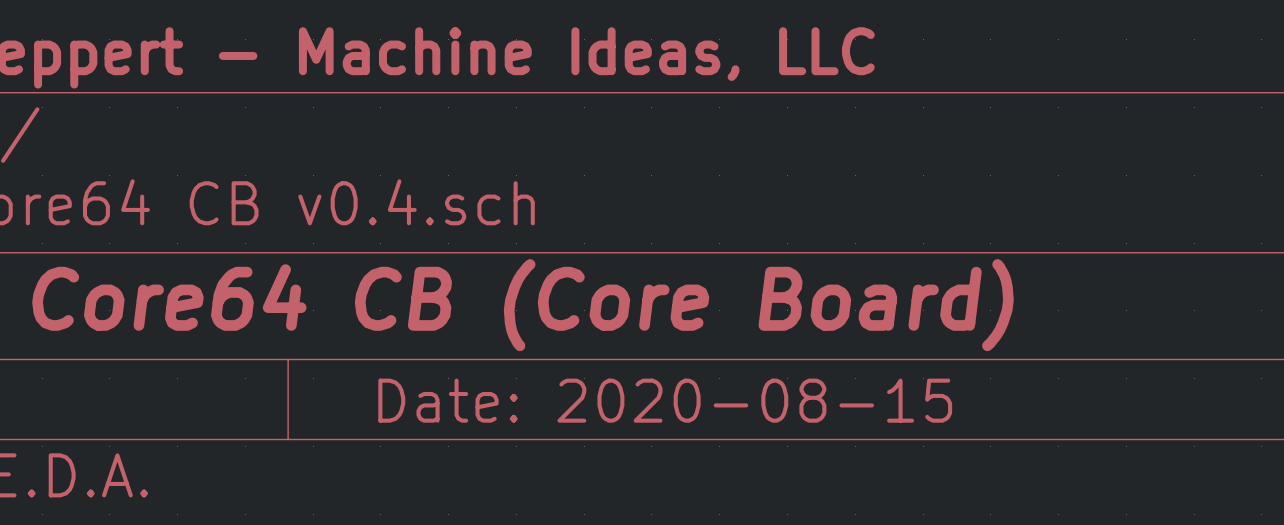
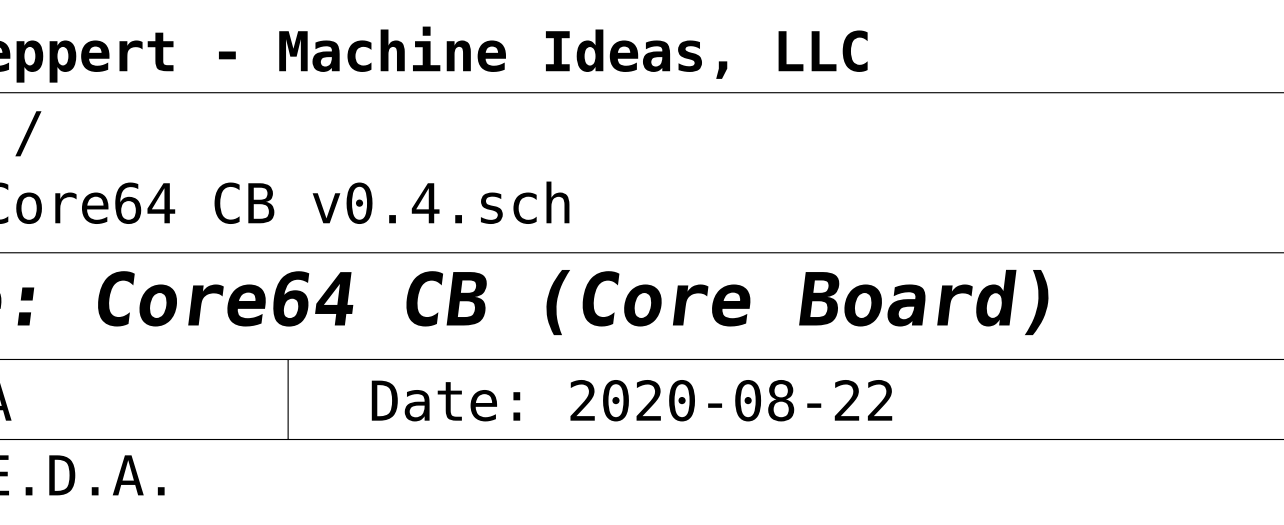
title block: Date: 2020-08-15 (665, 400) -> Date: 2020-08-22 (632, 400)

